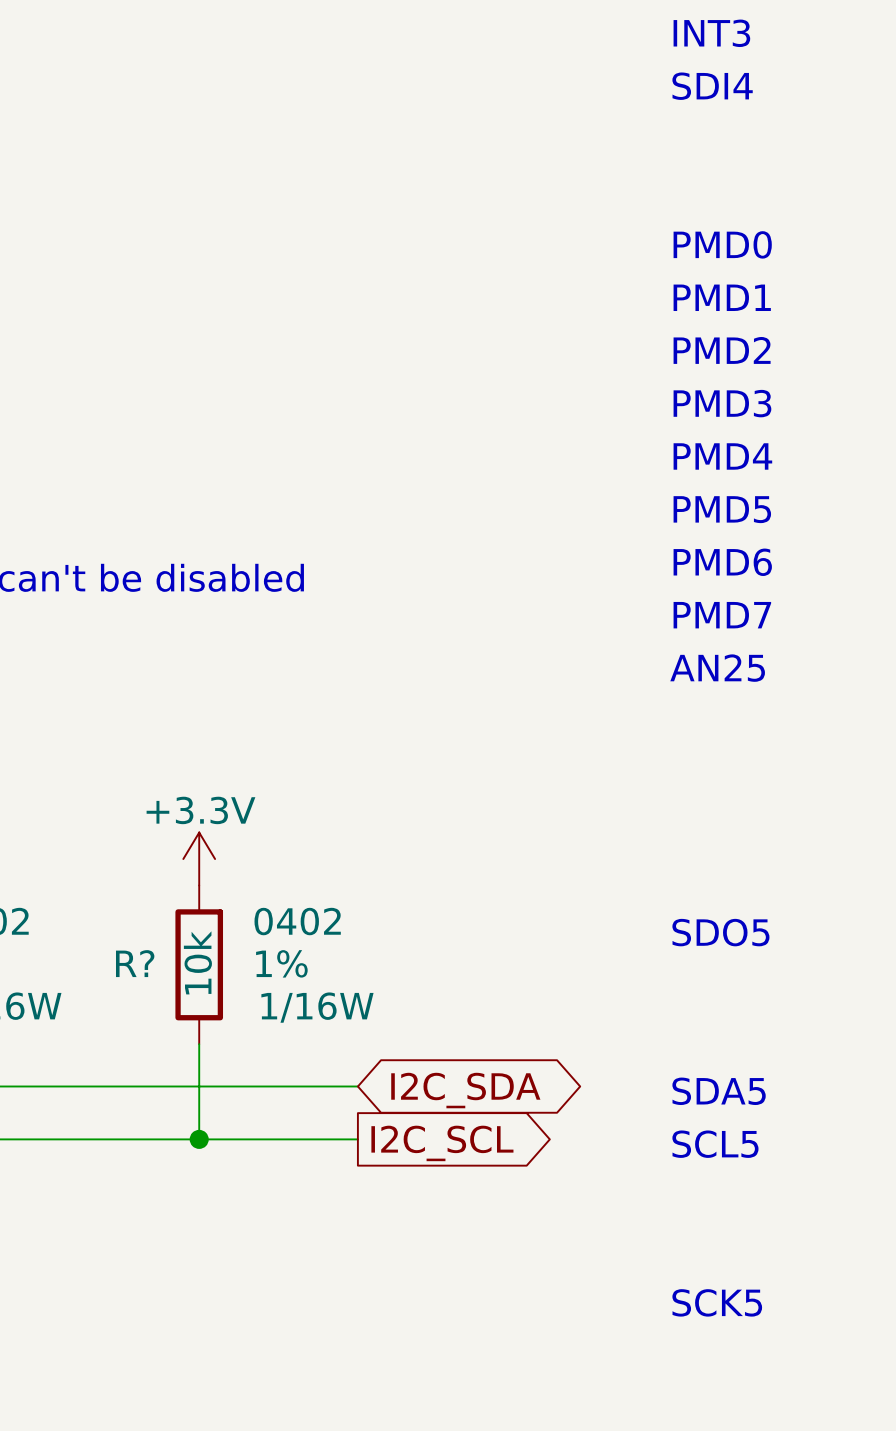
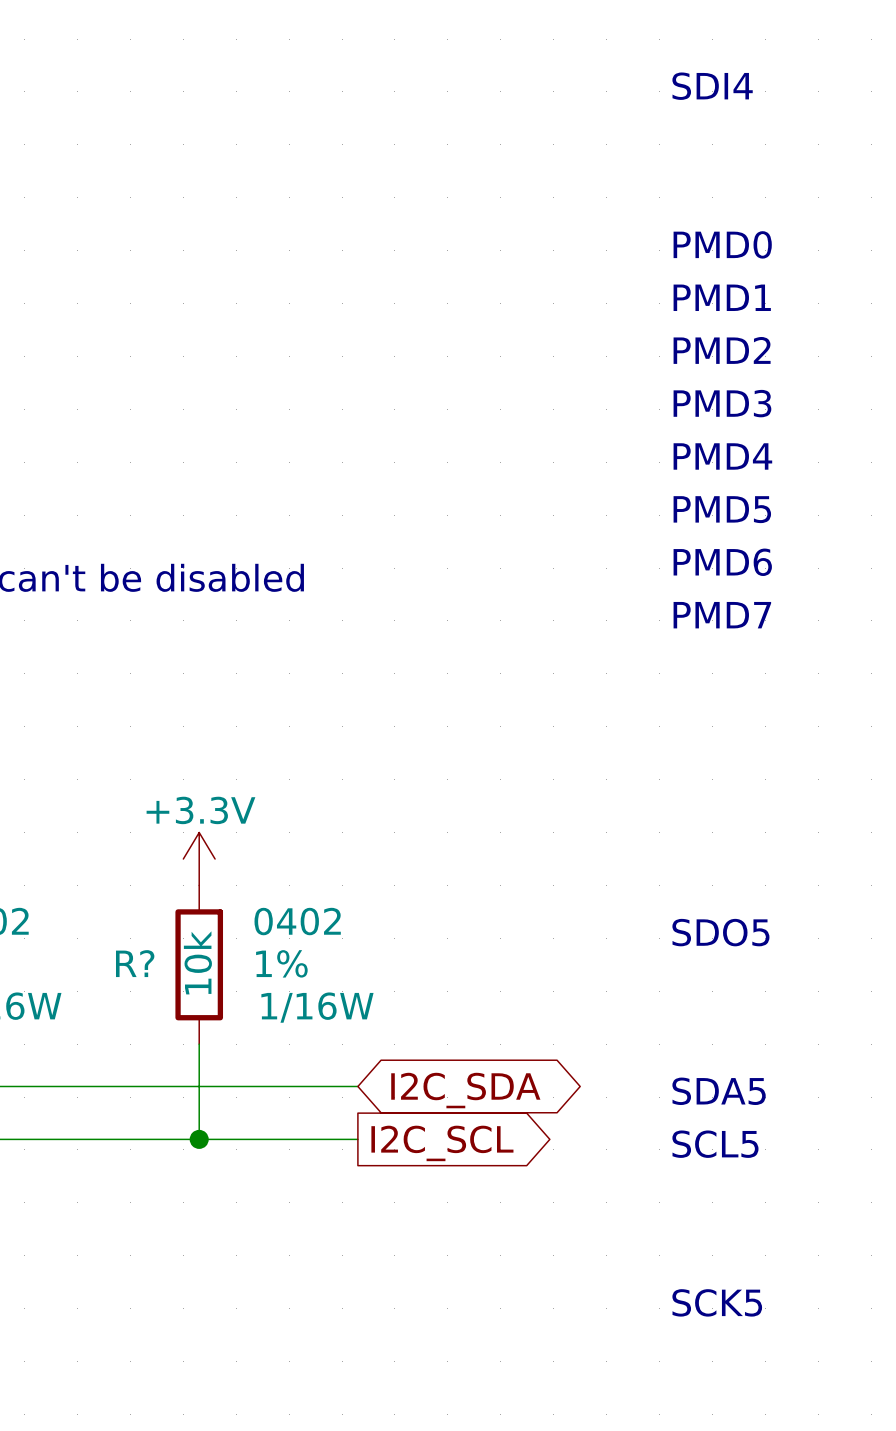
text: INT3 (711, 33) -> none
text: AN25 (717, 668) -> none

